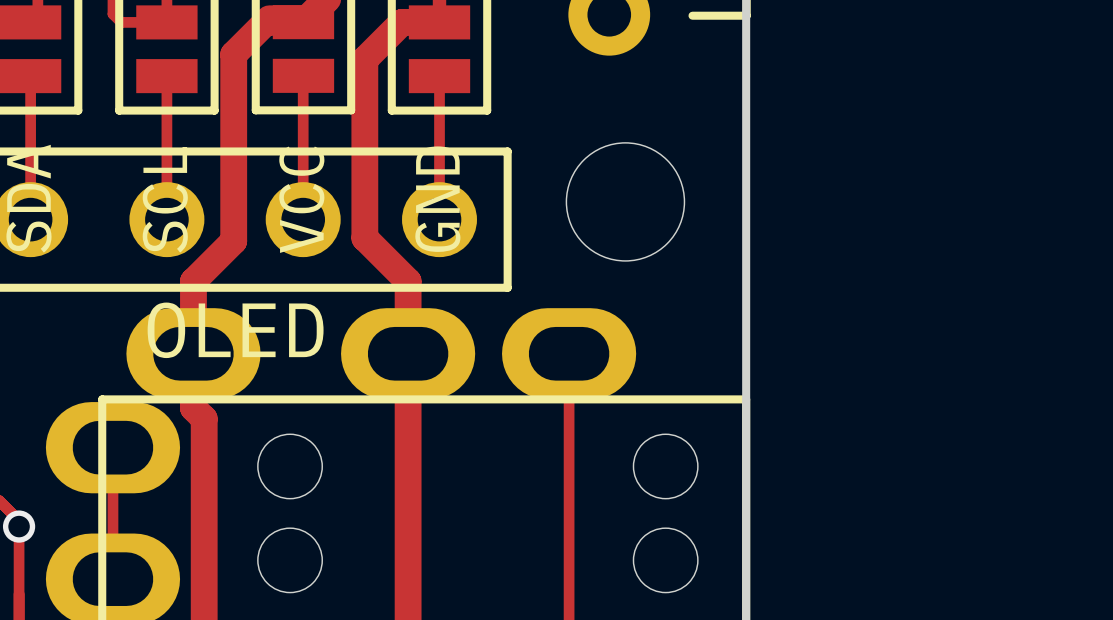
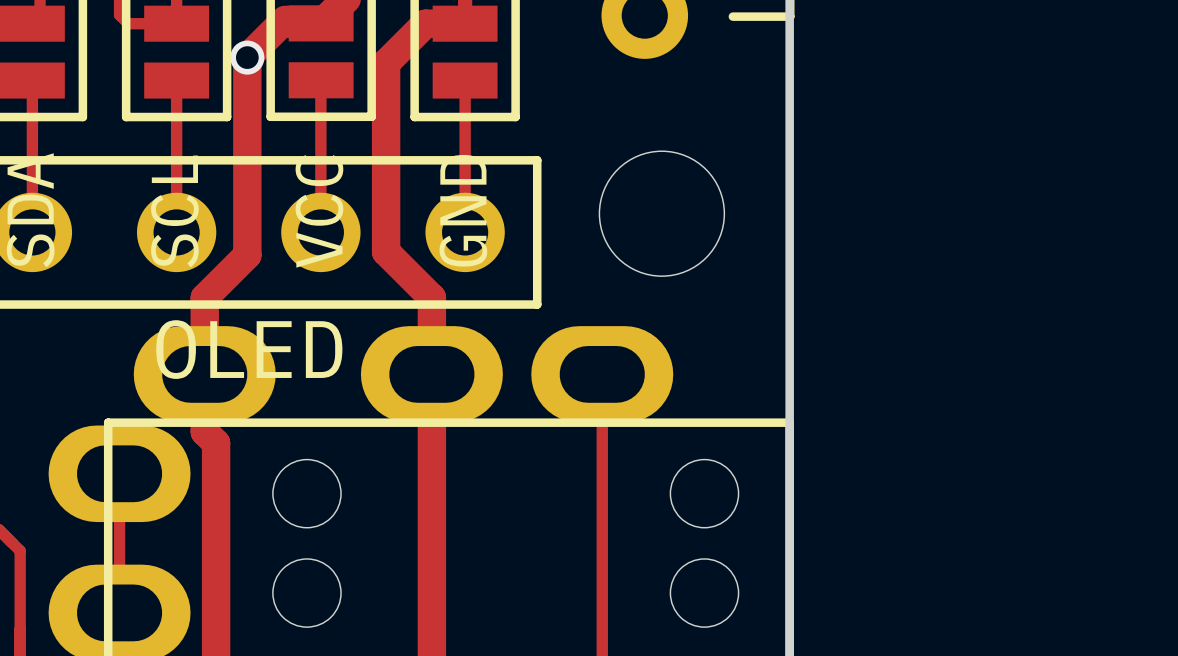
via: none -> (247, 57)
via: (19, 526) -> none

